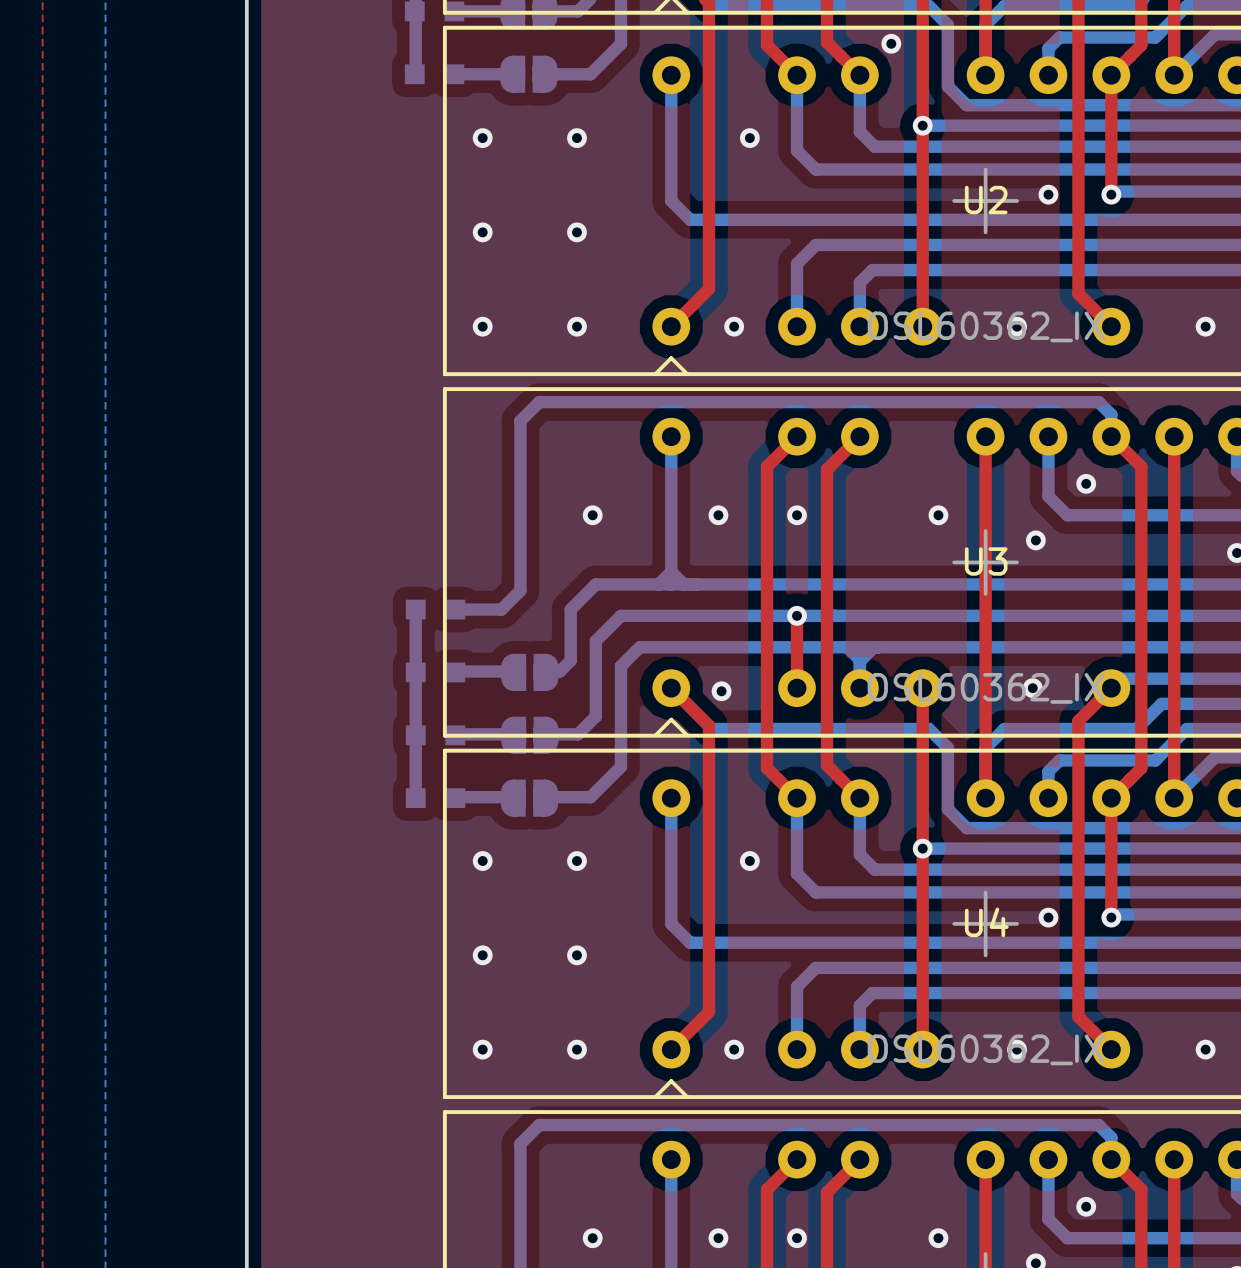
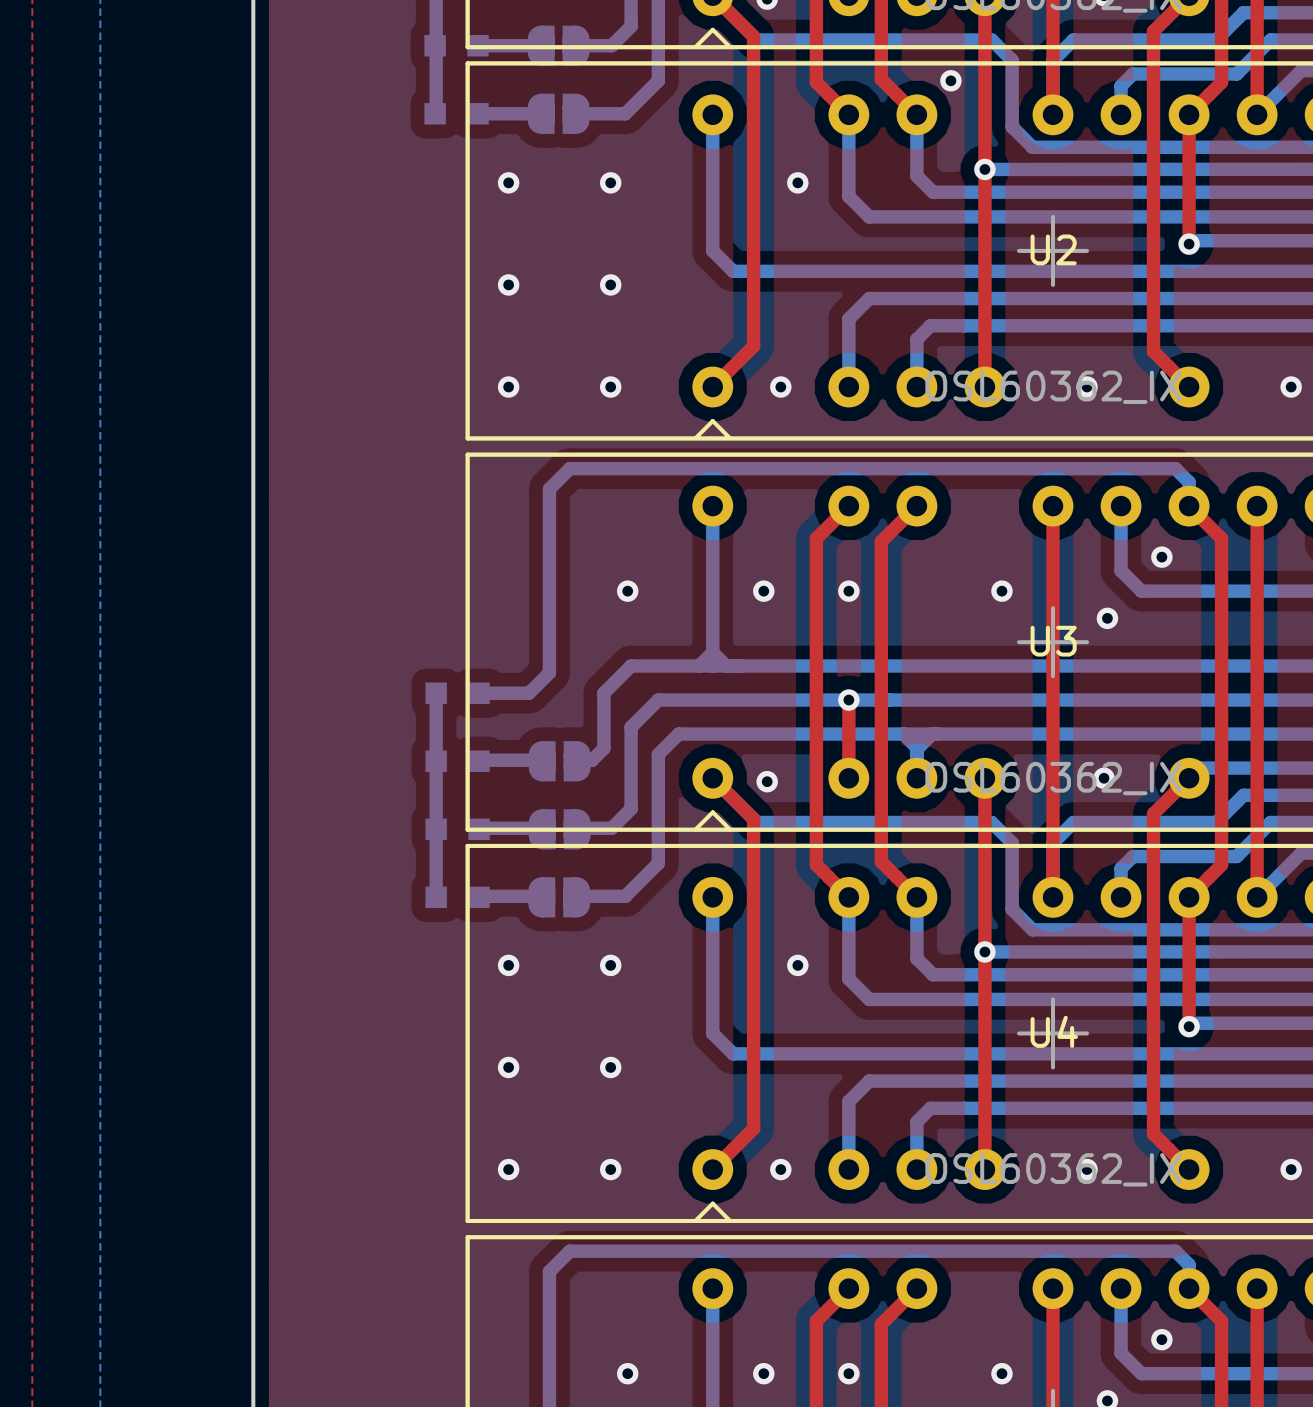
via: (1048, 194) -> none
via: (1048, 917) -> none

